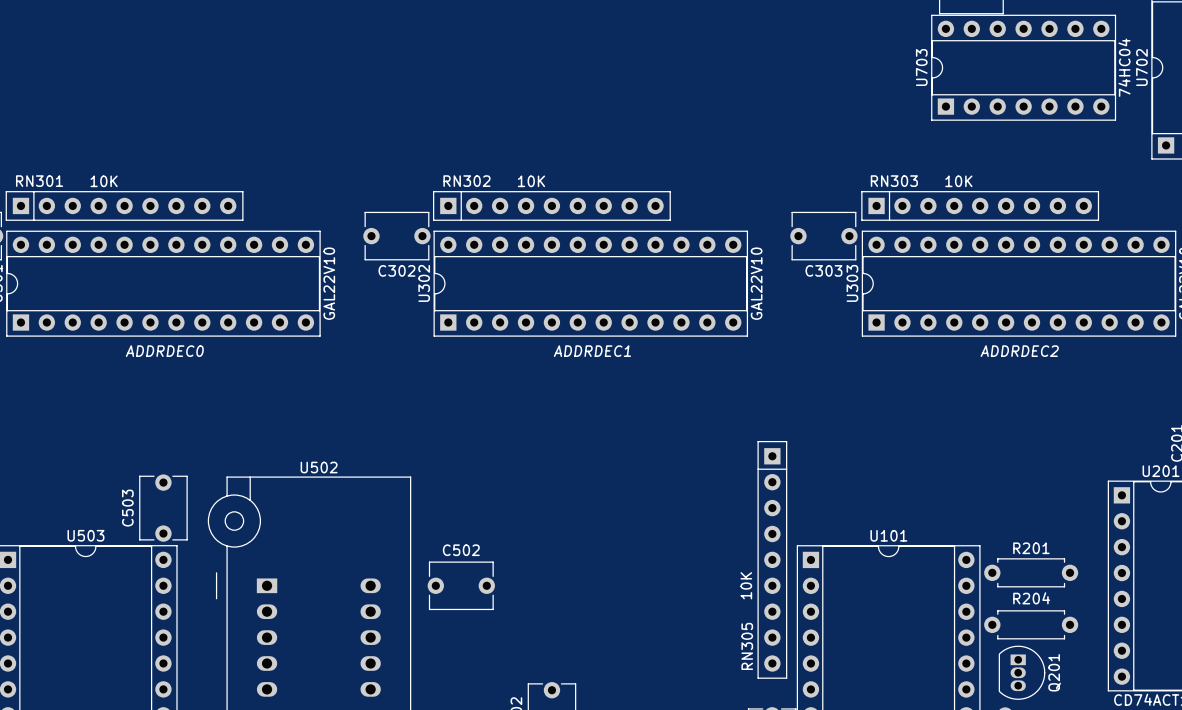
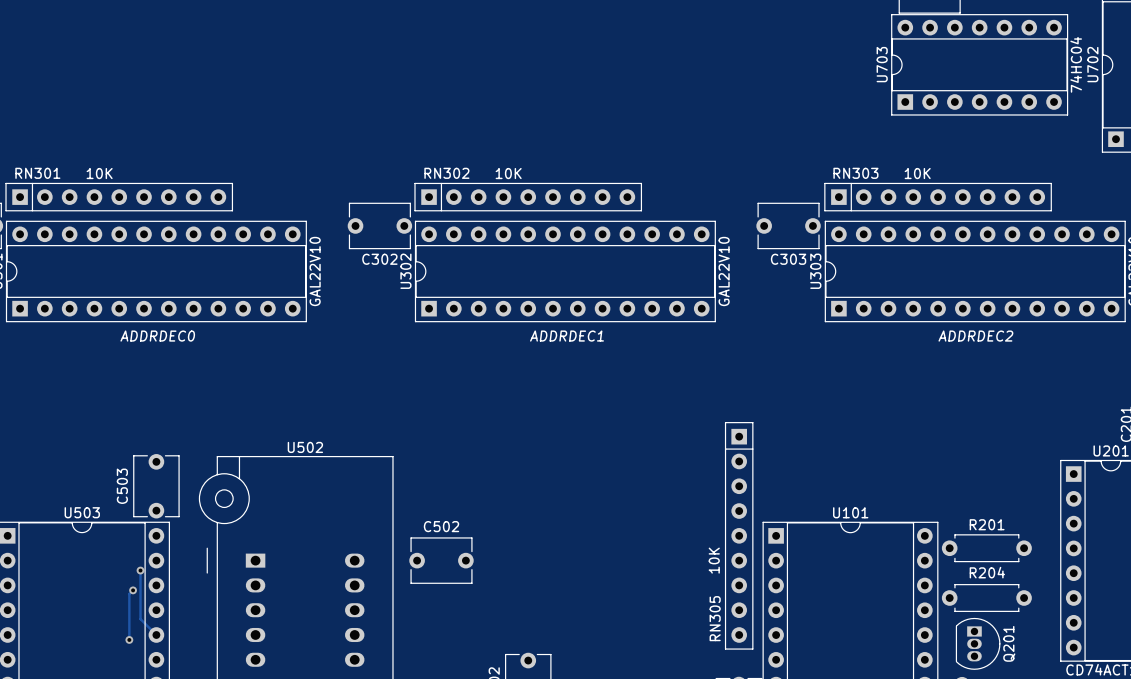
track: none -> (140, 570) (140, 619) (156, 634)
via: none -> (140, 570)
track: none -> (133, 590) (129, 594) (129, 639)
via: none -> (133, 590)
via: none -> (129, 639)

